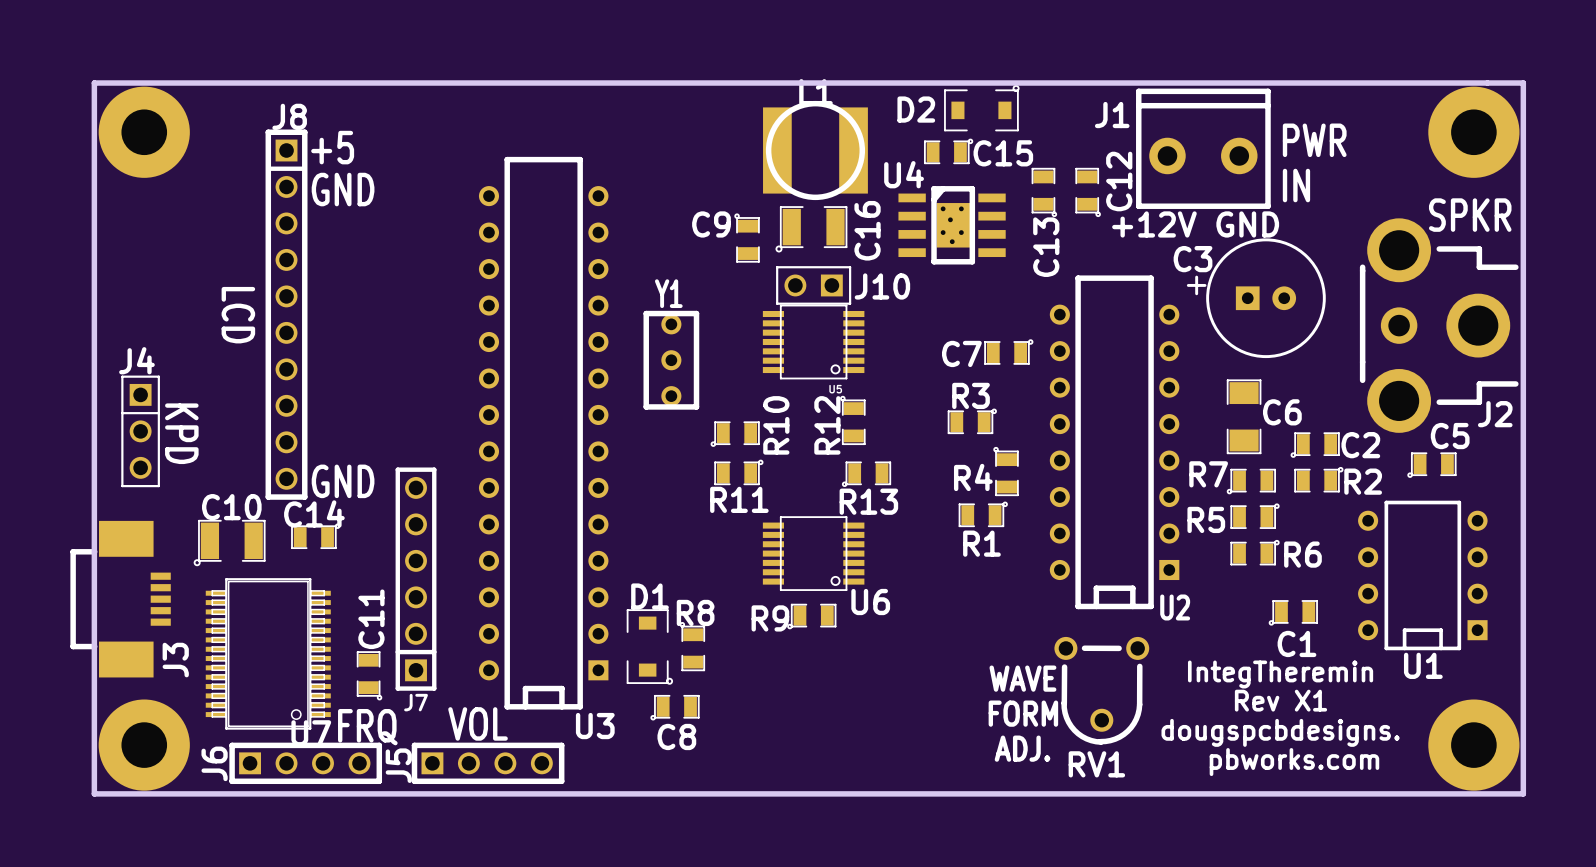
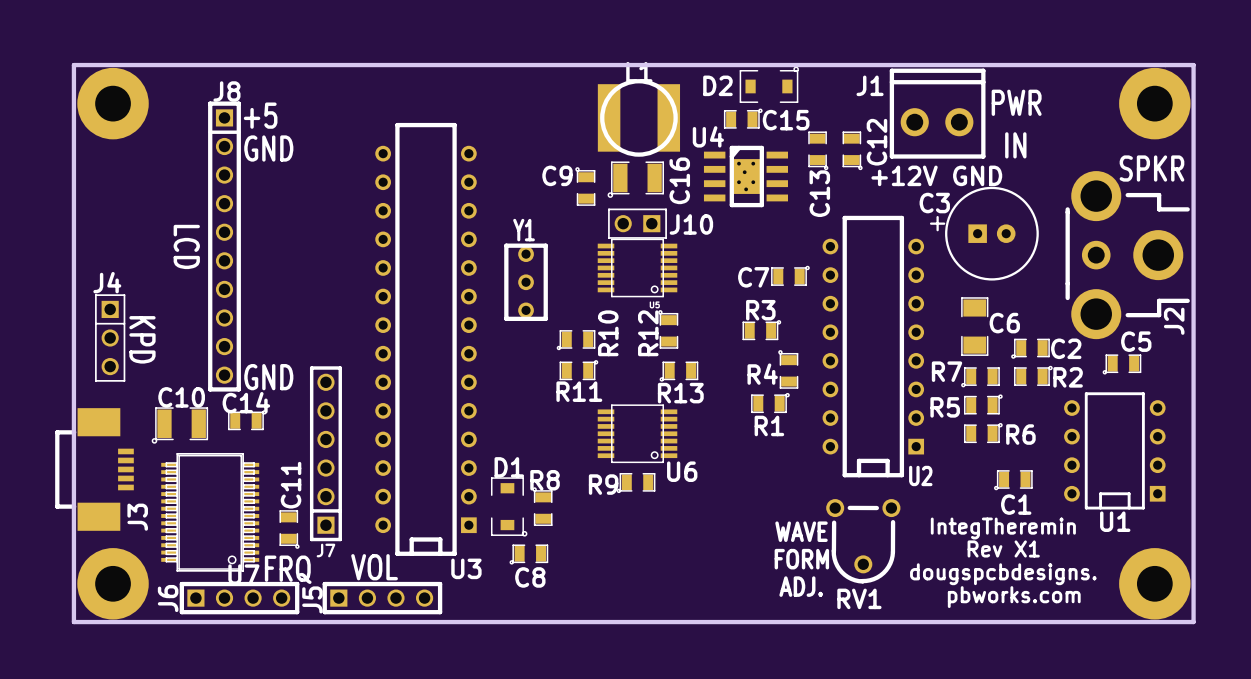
J1 footprint: [1136, 88, 1271, 209] -> [889, 68, 986, 159]
text position: PWR (1314, 140) -> PWR (1016, 102)
J2 name rotation: 0° (1495, 414) -> 90° counterclockwise (1174, 321)

